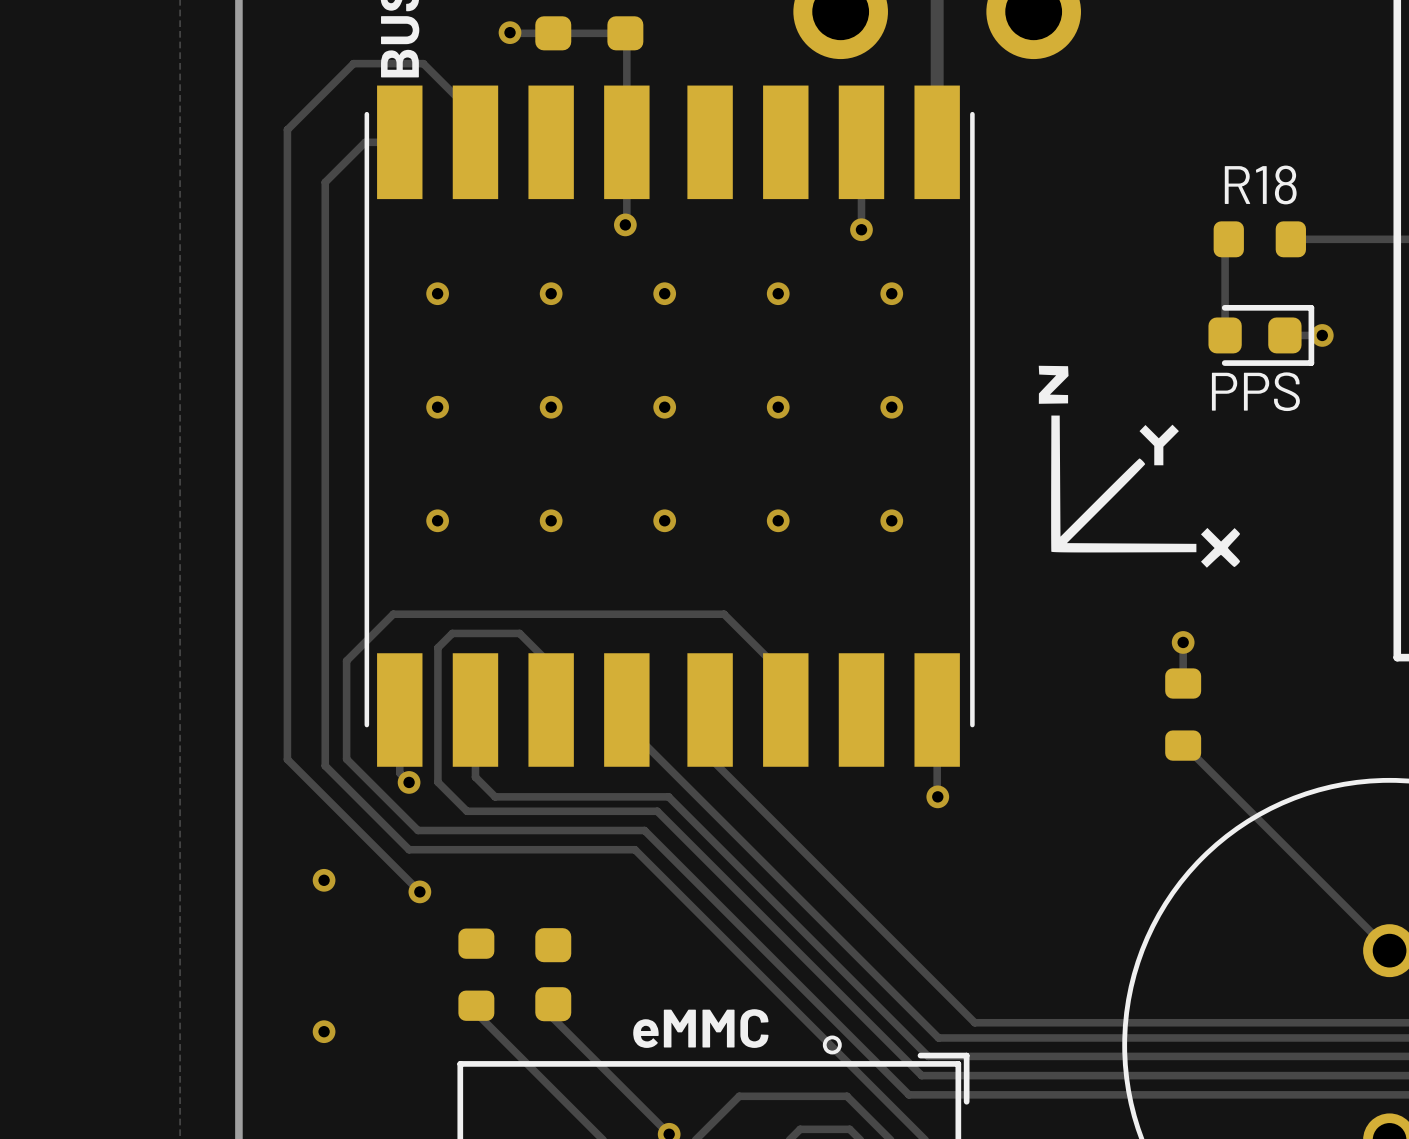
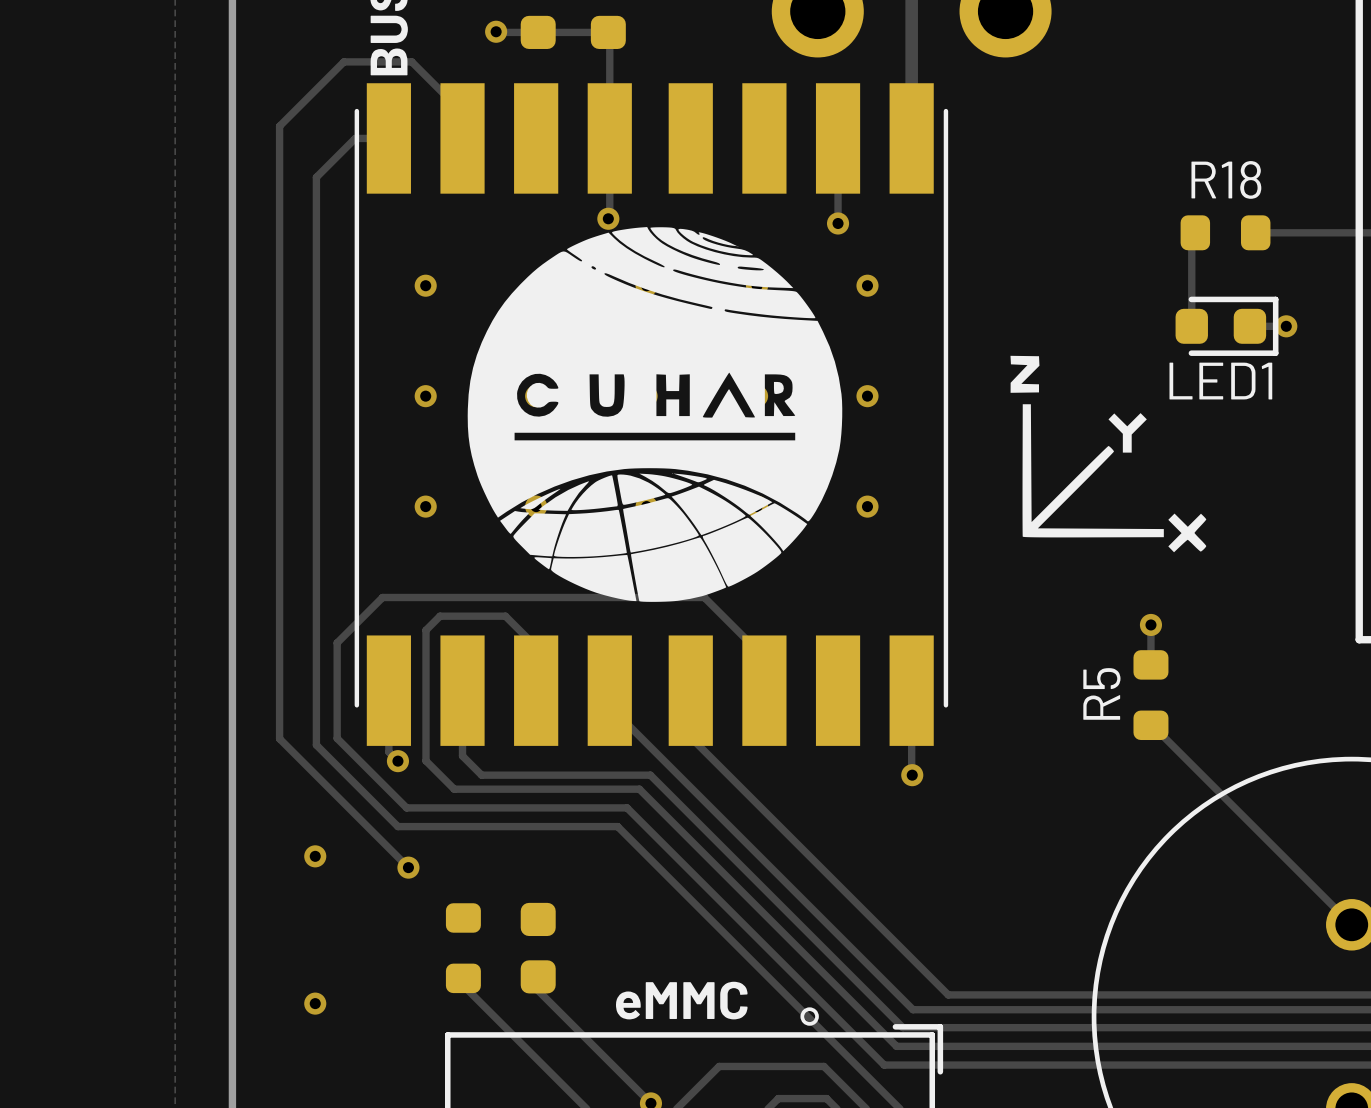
drawing: none -> [467, 227, 843, 602]
PPS name: PPS (1255, 391) -> LED1 (1220, 381)
R5 name: none -> R5 (1101, 693)

